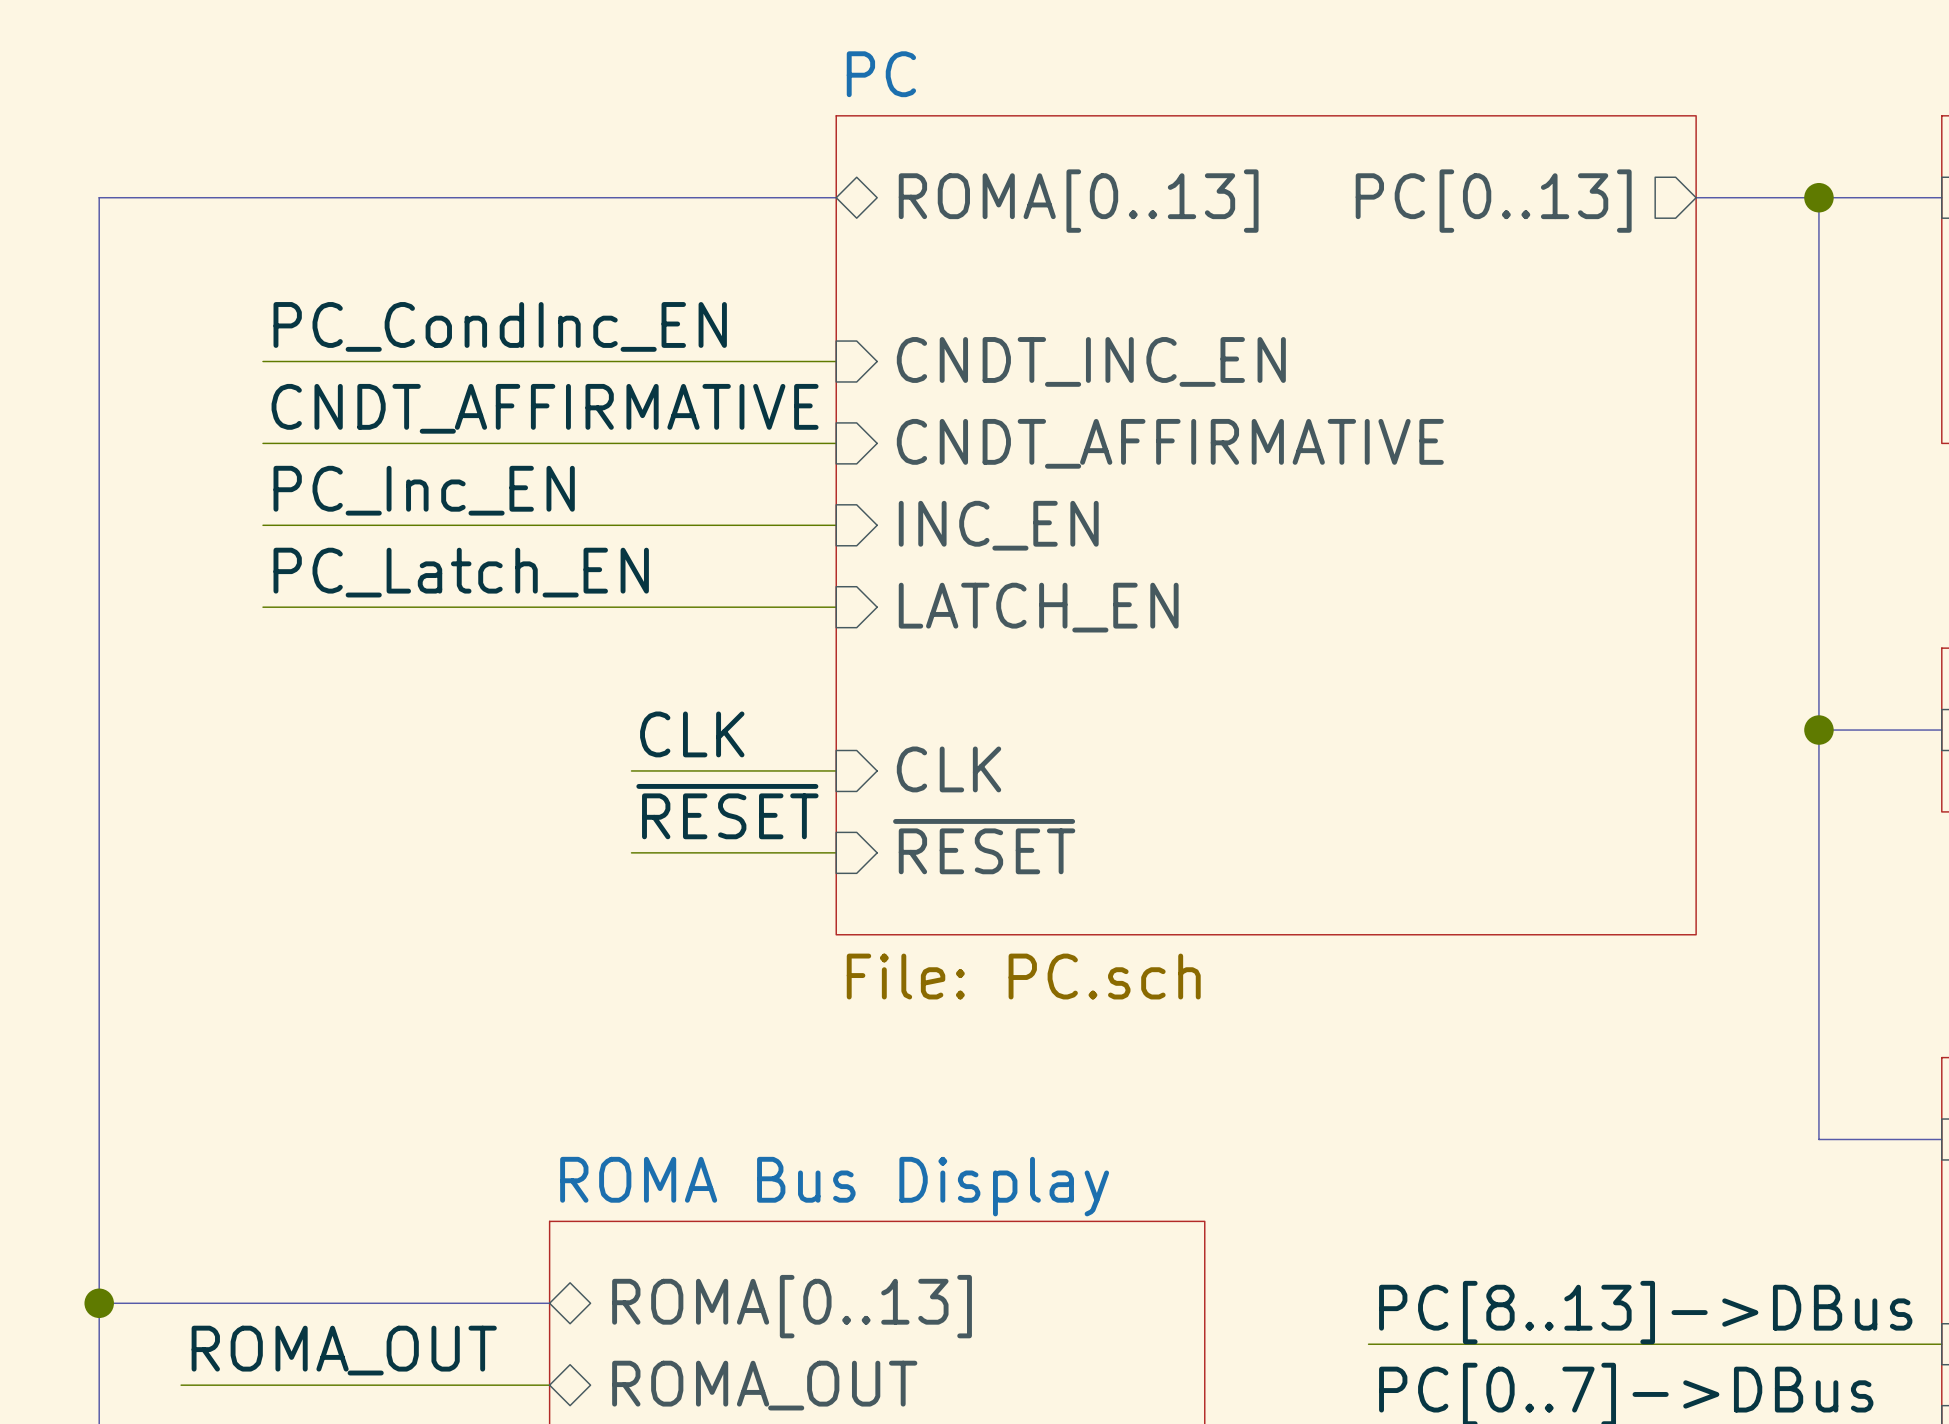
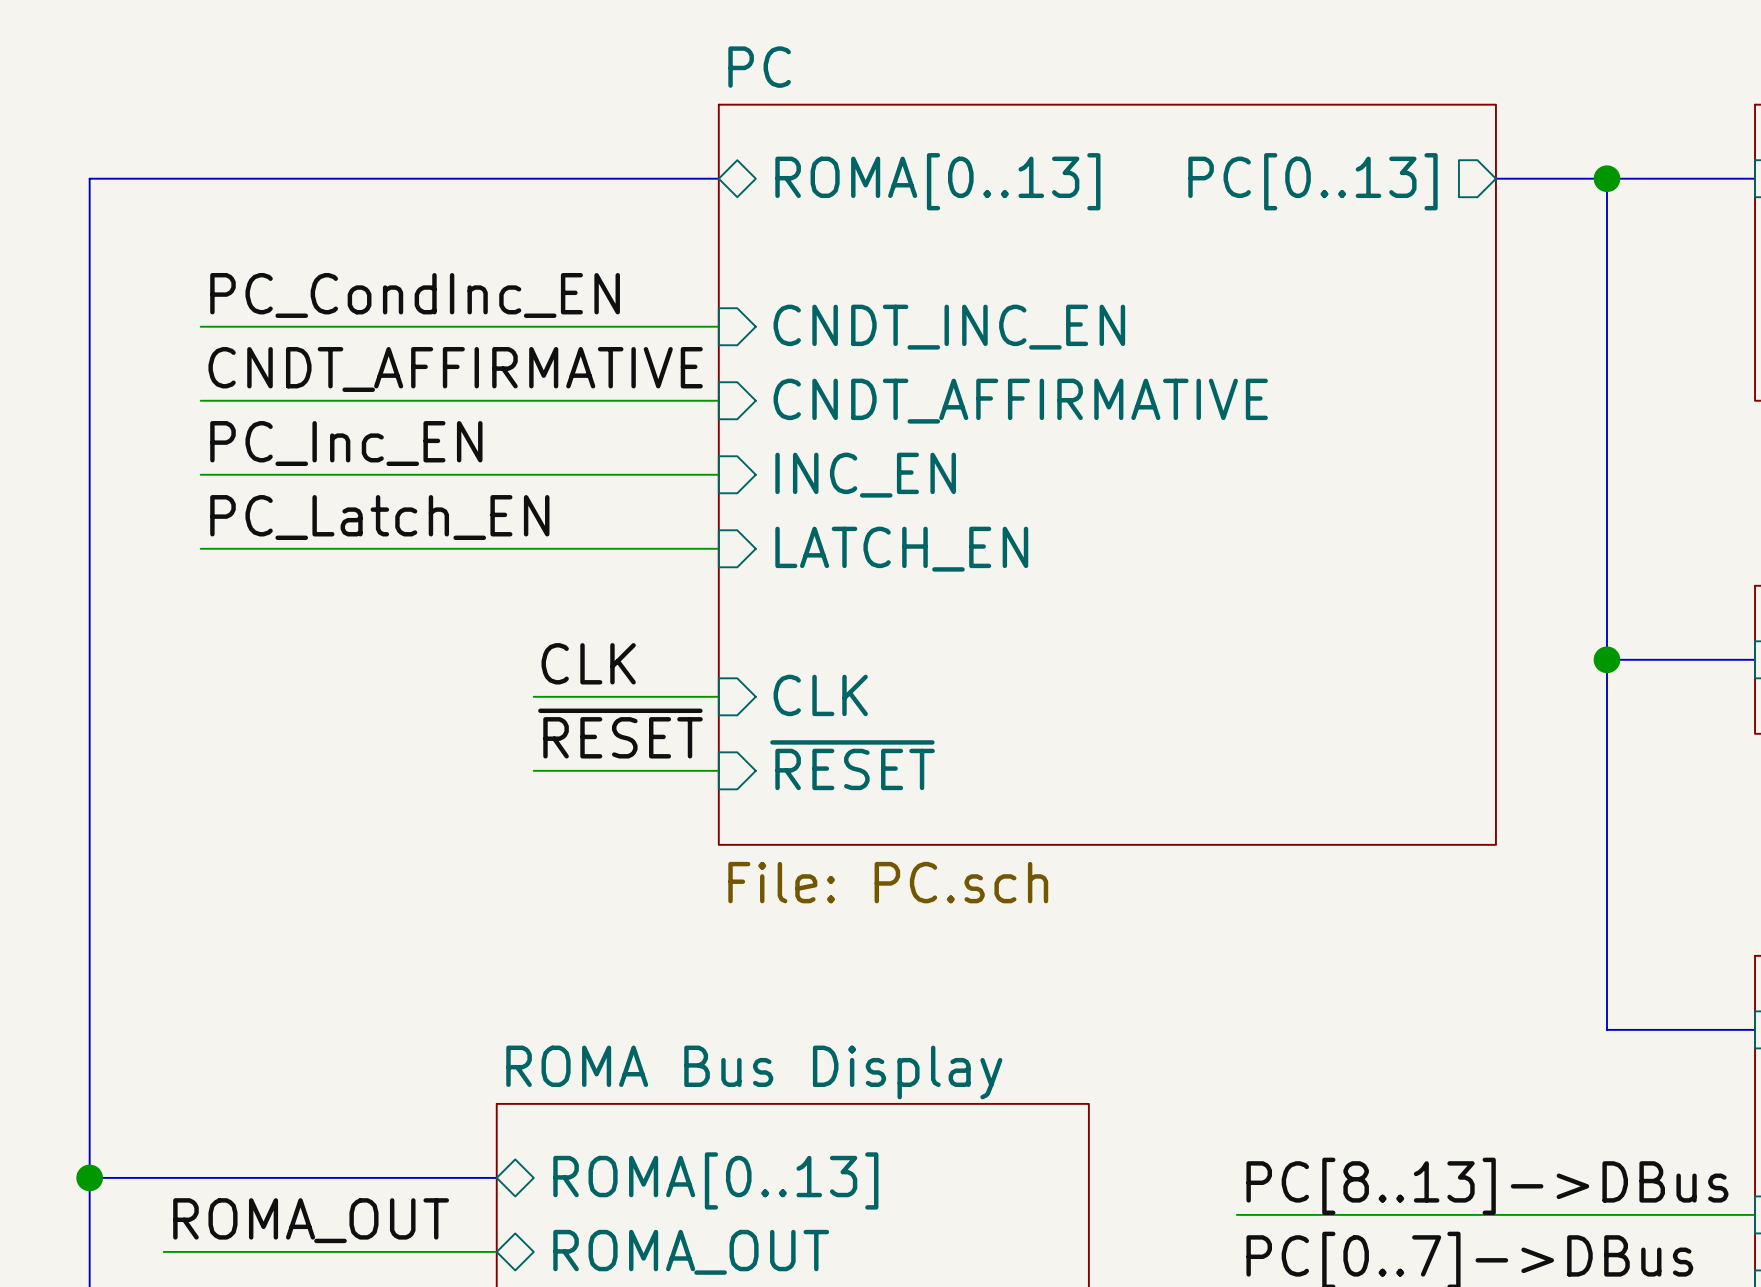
bus: (795, 197) (836, 197) -> none
bus: none -> (1495, 178) (1532, 178)
bus: (1818, 197) (1818, 1139) -> (1606, 178) (1606, 1029) (1643, 1029)
junction position: (1818, 197) -> (1606, 178)
sheet pin position: ROMA[0..13] (1078, 201) -> ROMA[0..13] (937, 181)
sheet pin position: PC[0..13] (1493, 201) -> PC[0..13] (1312, 181)
label position: PC_CondInc_EN (500, 326) -> PC_CondInc_EN (415, 295)
wire: (795, 361) (836, 361) -> (200, 326) (237, 326)
sheet pin position: CNDT_INC_EN (1091, 361) -> CNDT_INC_EN (949, 327)
label position: CNDT_AFFIRMATIVE (545, 408) -> CNDT_AFFIRMATIVE (455, 369)
wire: (795, 443) (836, 443) -> (200, 400) (237, 400)
sheet pin position: CNDT_AFFIRMATIVE (1170, 443) -> CNDT_AFFIRMATIVE (1020, 401)
label position: PC_Inc_EN (424, 490) -> PC_Inc_EN (346, 443)
wire: (795, 525) (836, 525) -> (200, 474) (237, 474)
sheet pin position: INC_EN (998, 525) -> INC_EN (865, 475)
sheet PC position: (1266, 525) -> (1107, 474)
label position: PC_Latch_EN (461, 572) -> PC_Latch_EN (379, 517)
wire: (795, 607) (836, 607) -> (200, 548) (237, 548)
sheet pin position: LATCH_EN (1038, 607) -> LATCH_EN (901, 549)
bus: none -> (1606, 659) (1643, 659)
junction position: (1818, 730) -> (1606, 659)
label position: CLK (692, 734) -> CLK (588, 663)
sheet pin position: CLK (948, 769) -> CLK (820, 695)
wire: (795, 770) (836, 770) -> (533, 696) (570, 696)
label position: ~{RESET} (727, 811) -> ~{RESET} (620, 733)
sheet pin position: ~{RESET} (984, 846) -> ~{RESET} (852, 765)
wire: (795, 852) (836, 852) -> (533, 770) (570, 770)

